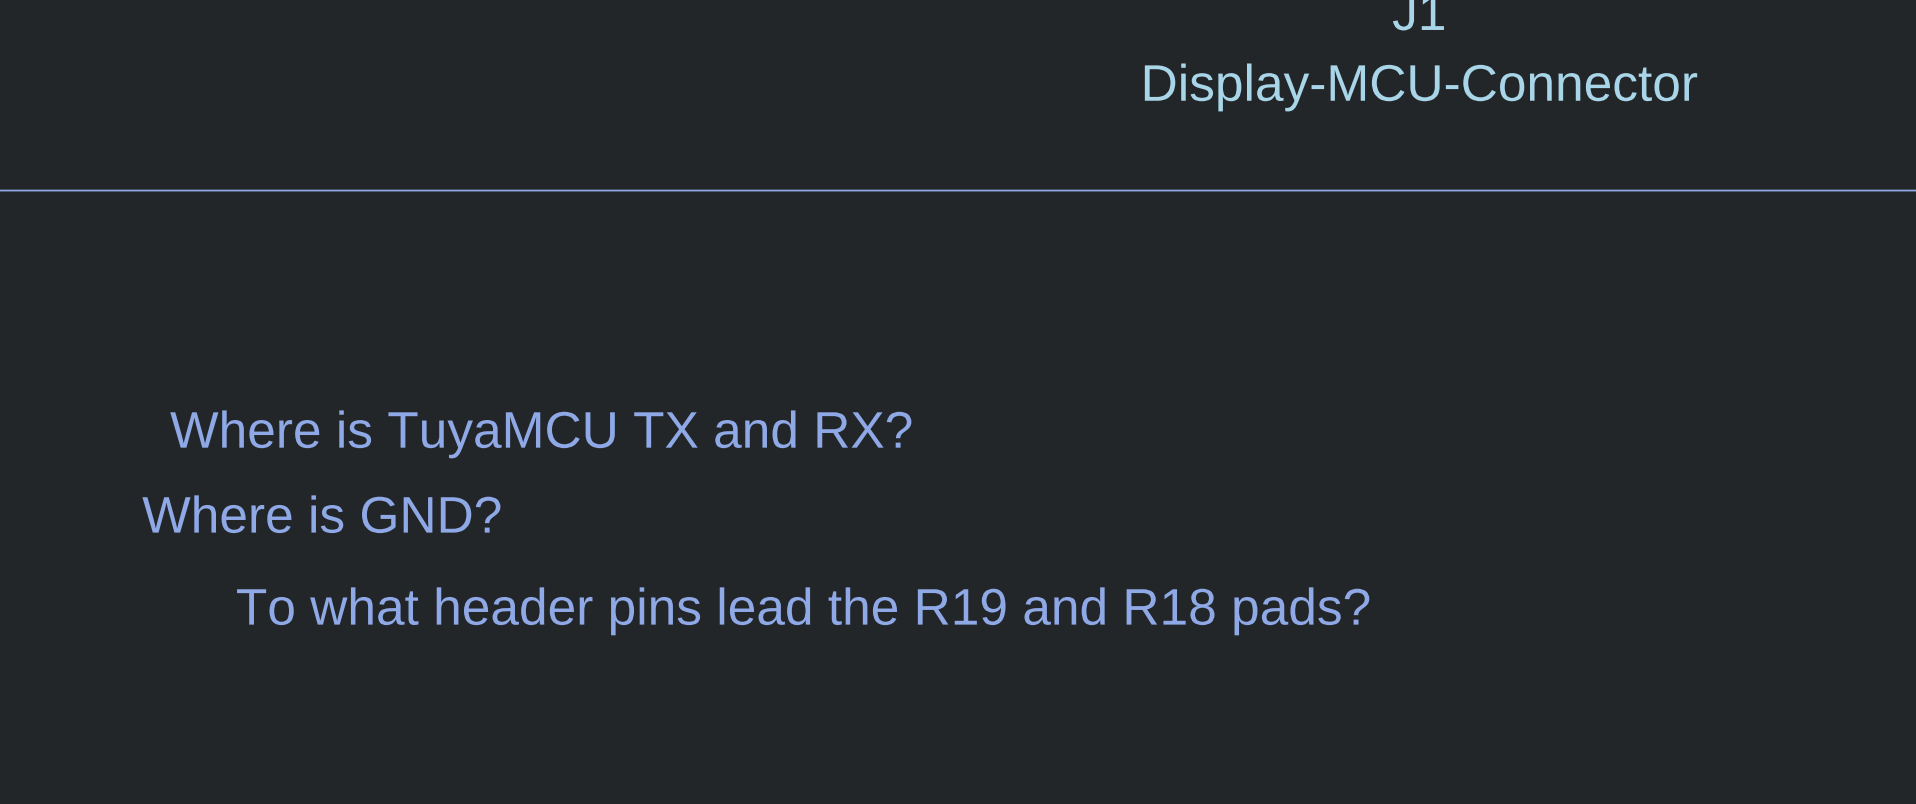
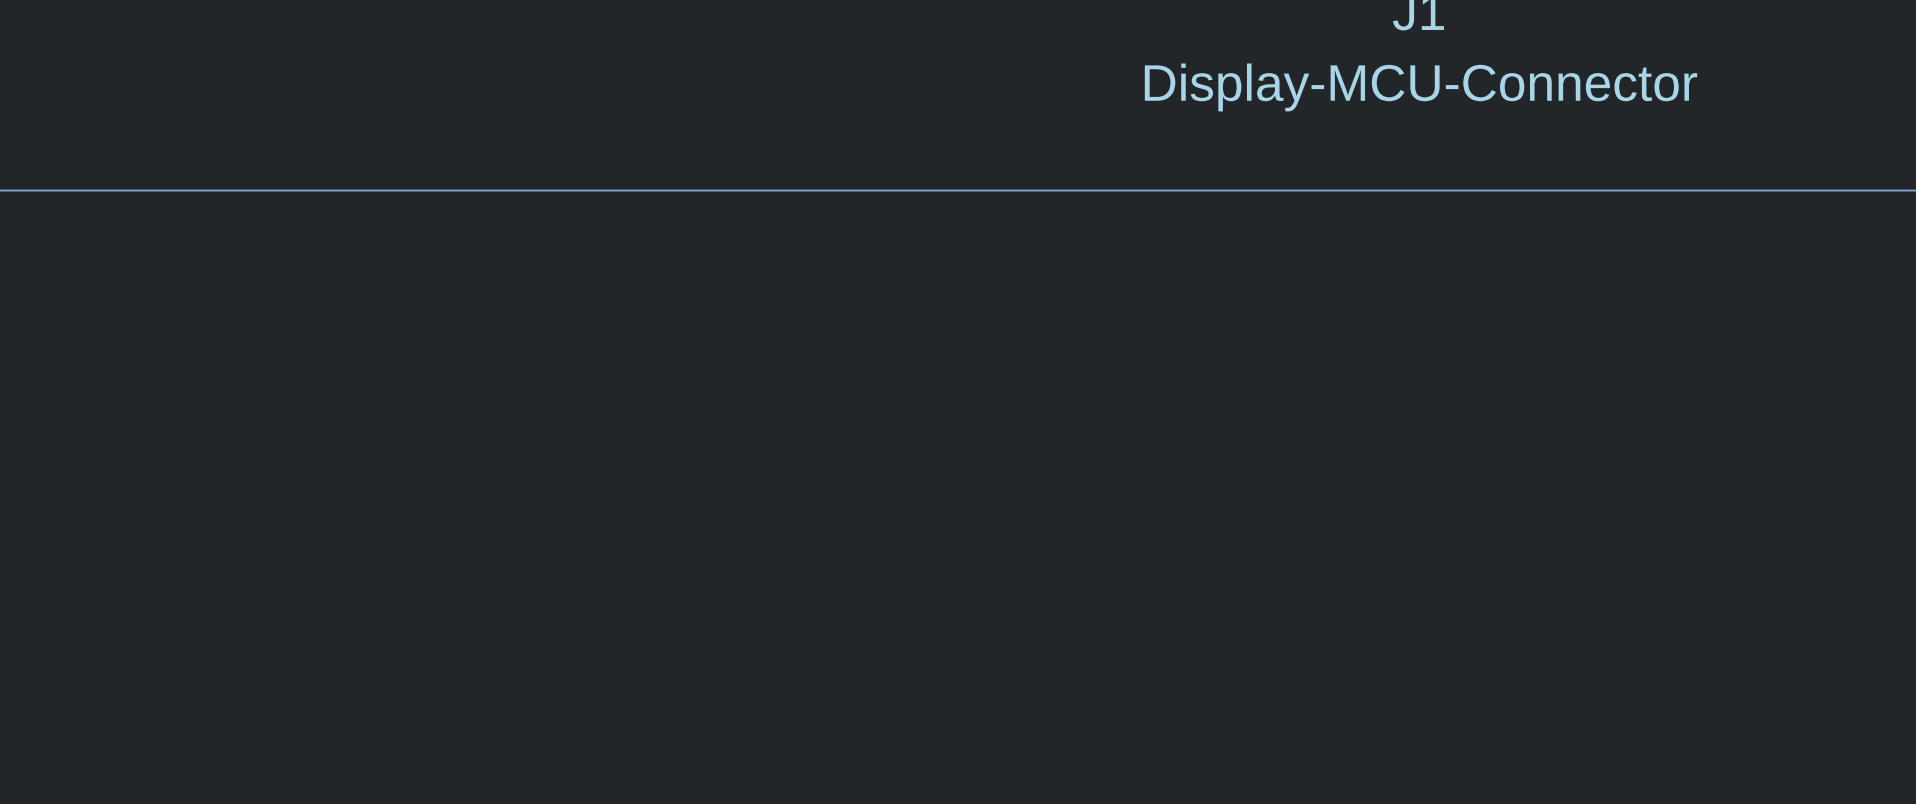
text: Where is TuyaMCU TX and RX? (540, 434) -> none
text: Where is GND? (321, 514) -> none
text: To what header pins lead the R19 and R18 pads? (803, 611) -> none

